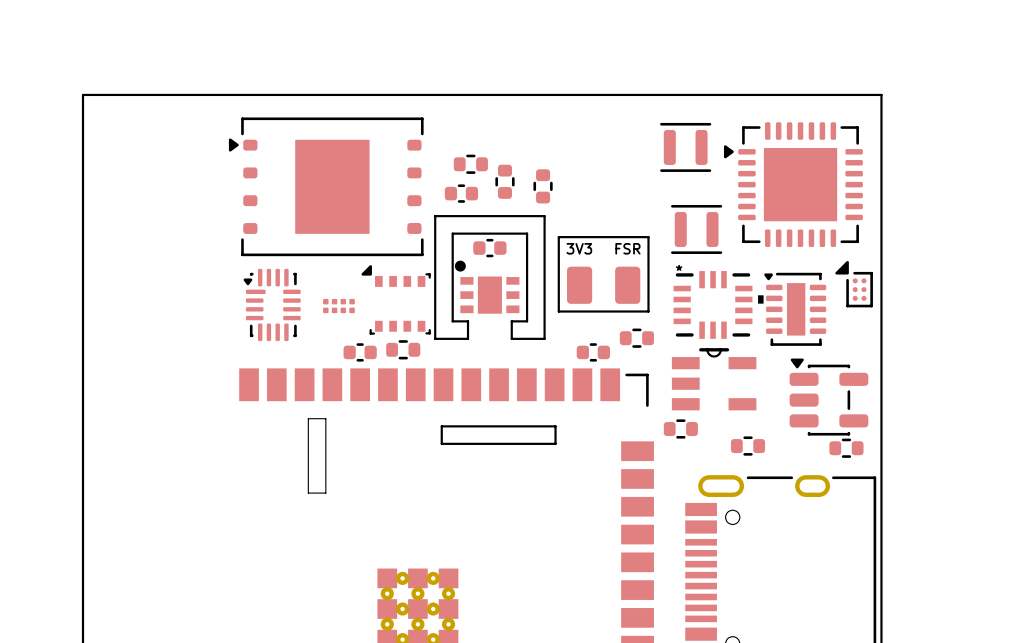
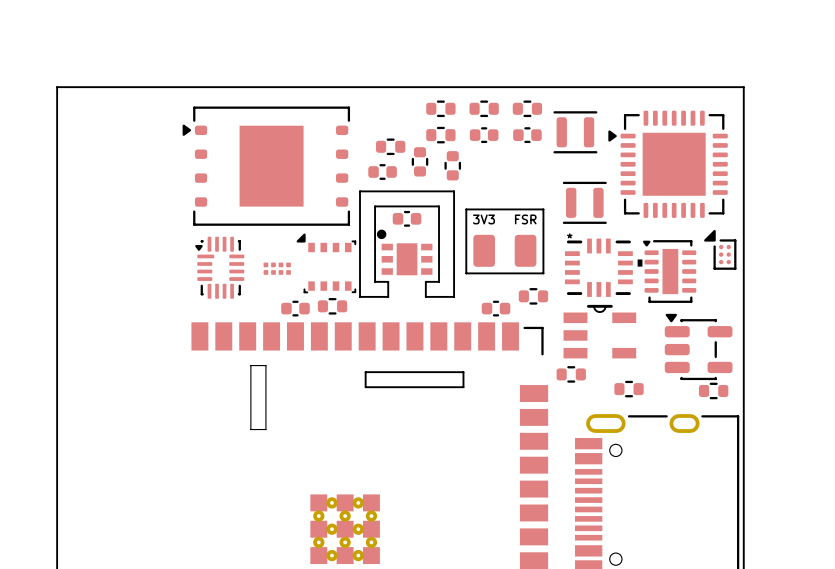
part: none -> (440, 108)
part: none -> (484, 108)
part: none -> (527, 108)
part: none -> (440, 135)
part: none -> (484, 135)
part: none -> (527, 135)

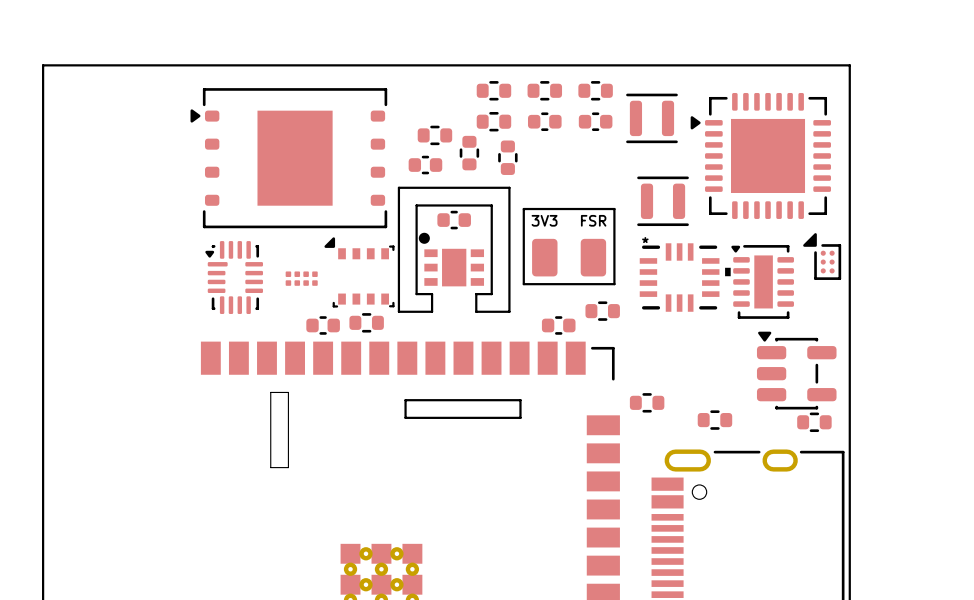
part: (599, 331) -> none

